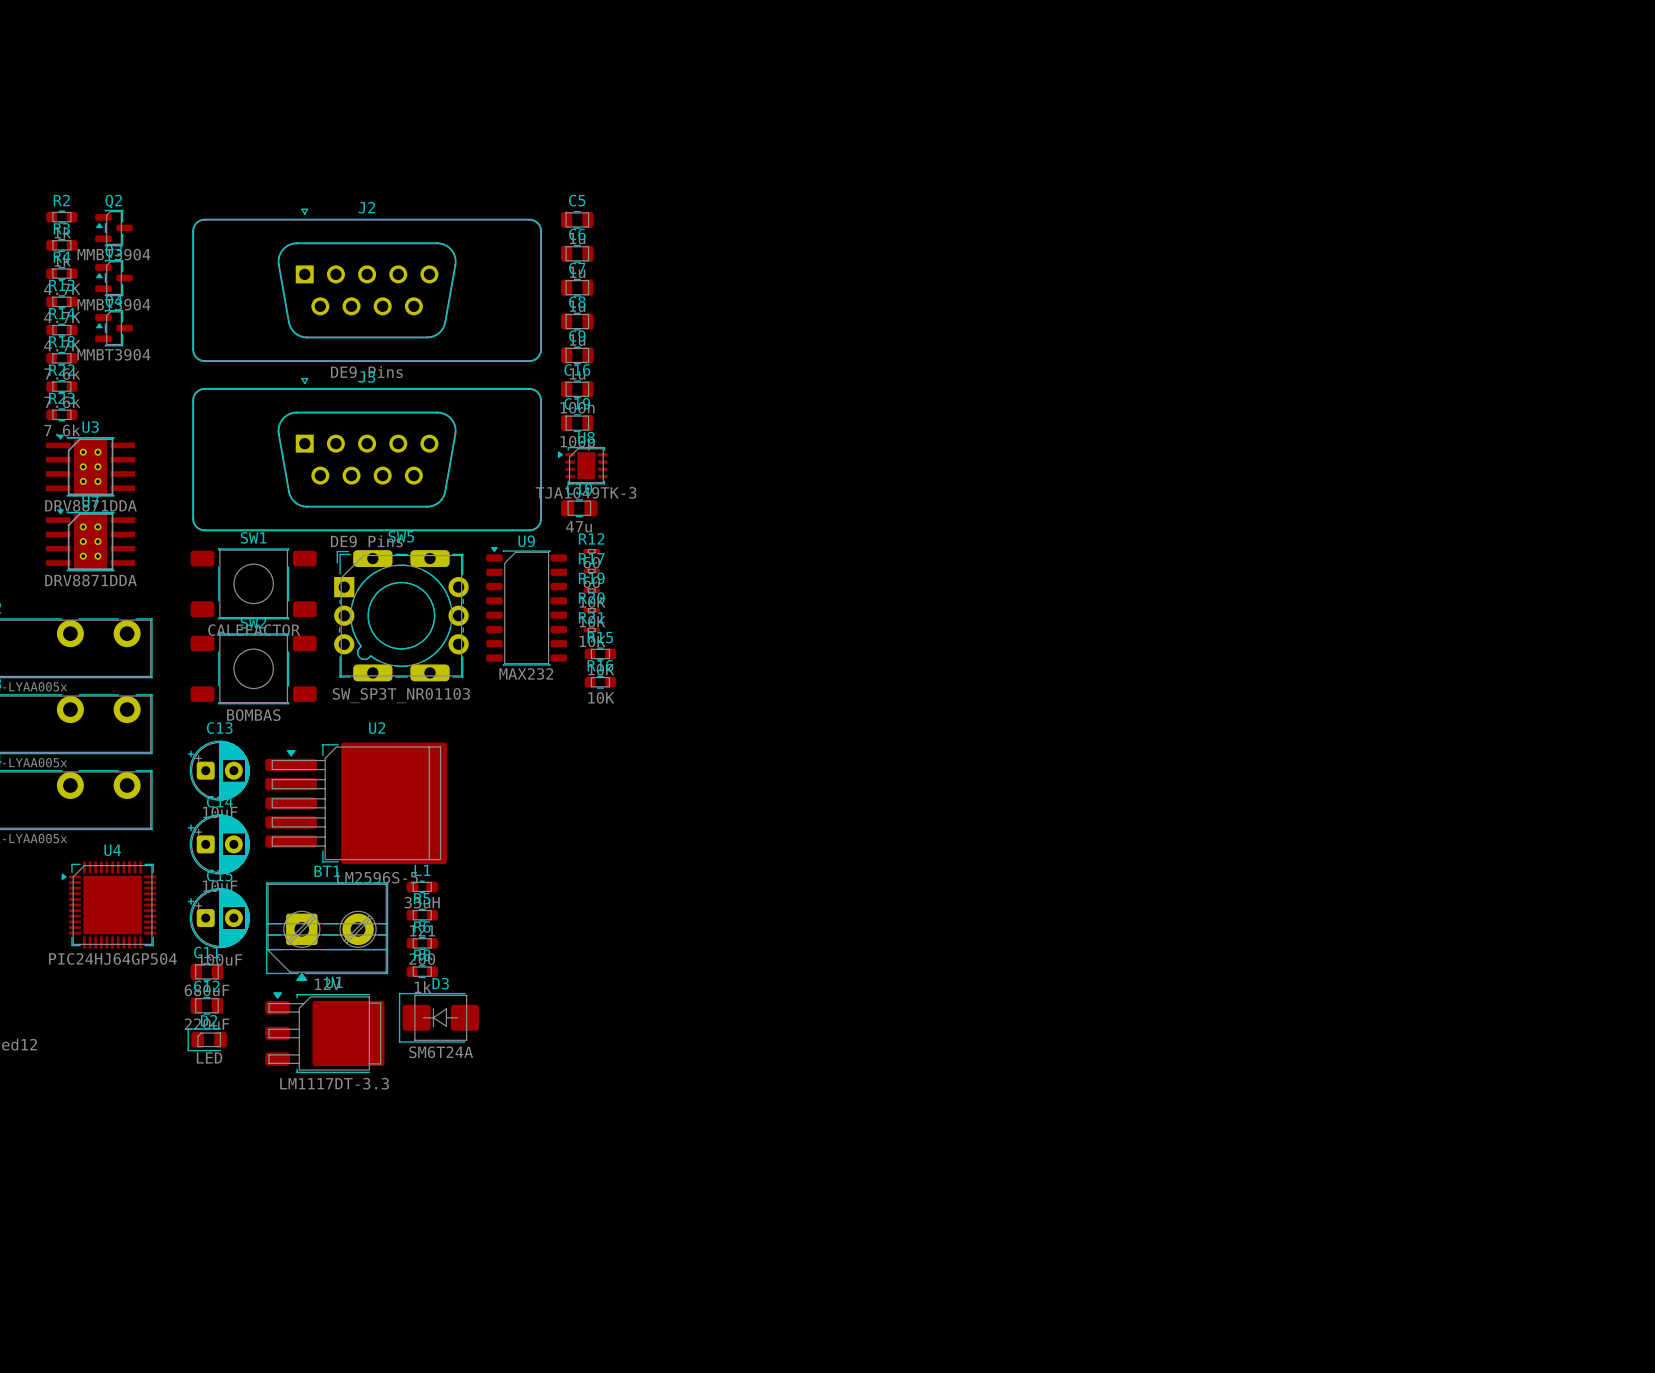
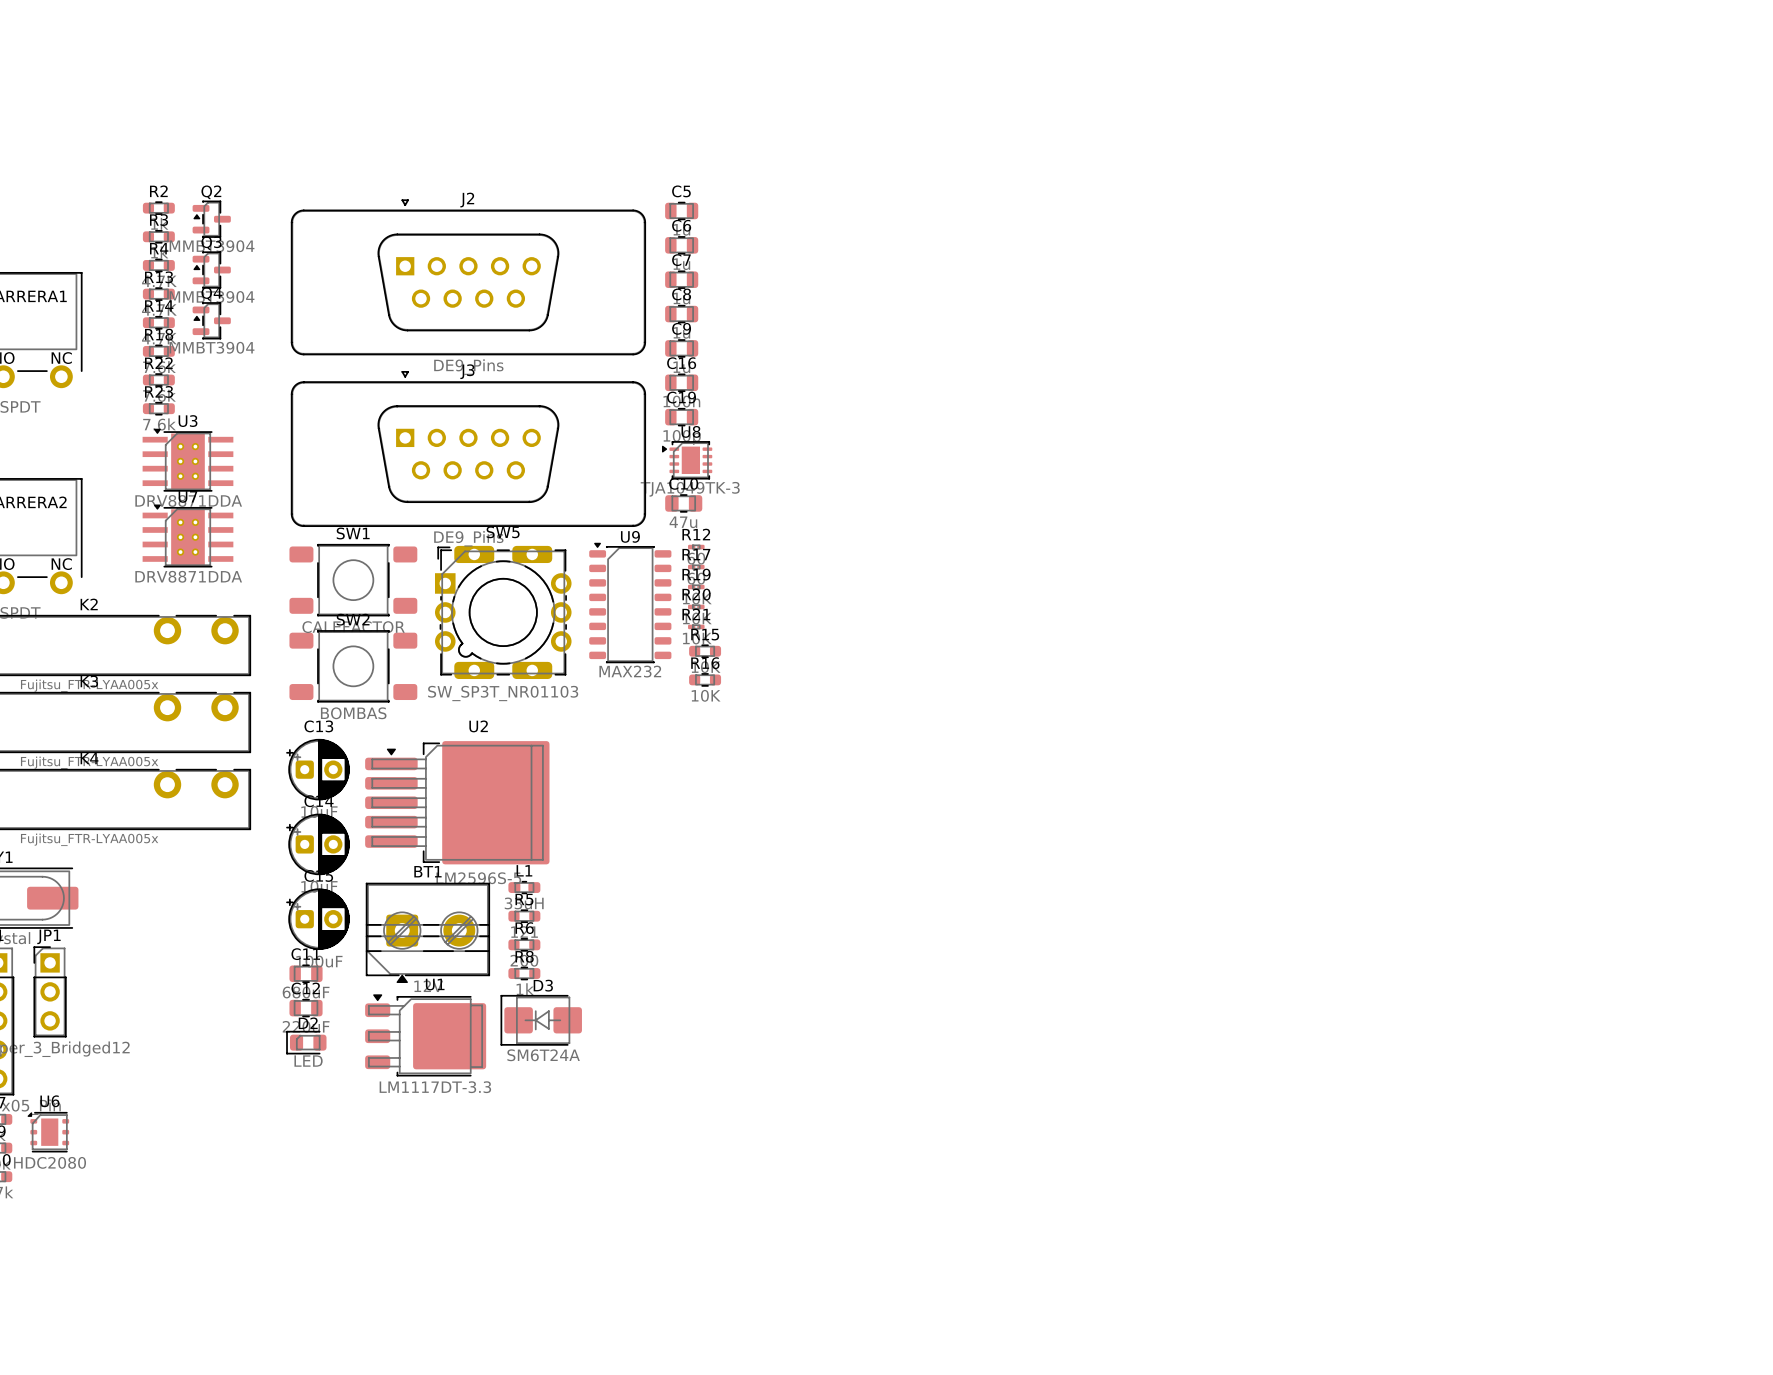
U4: PIC24HJ64GP504 (108, 904) -> none

